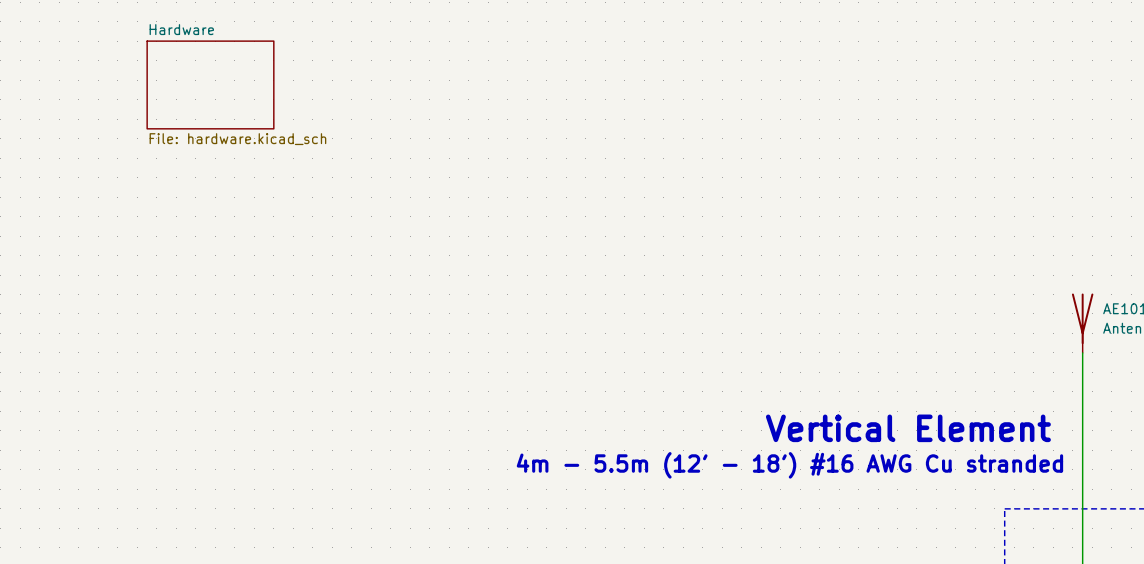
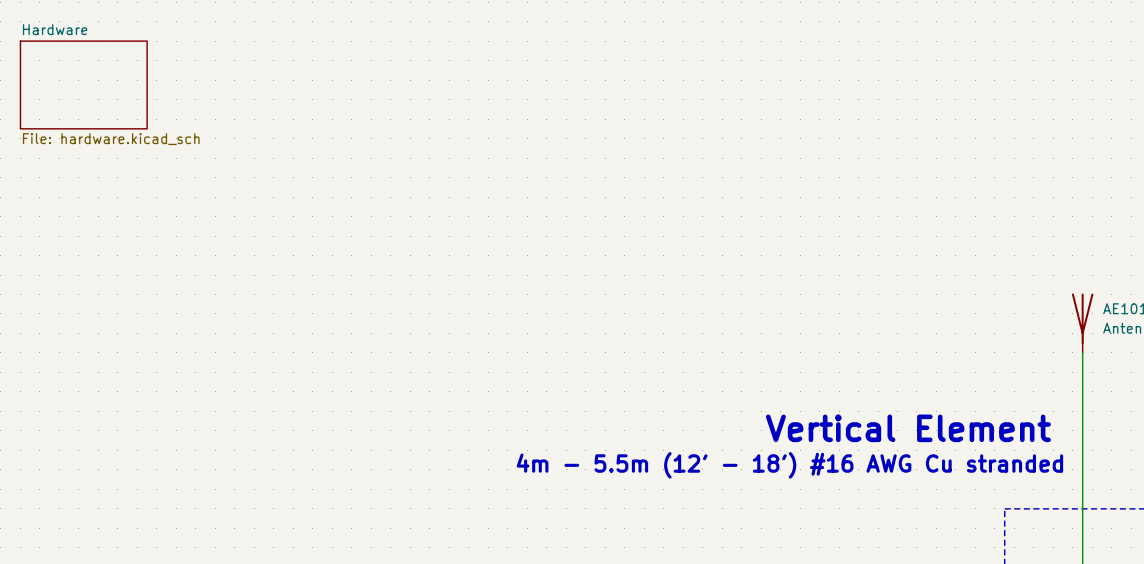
sheet Hardware position: (210, 84) -> (83, 84)

